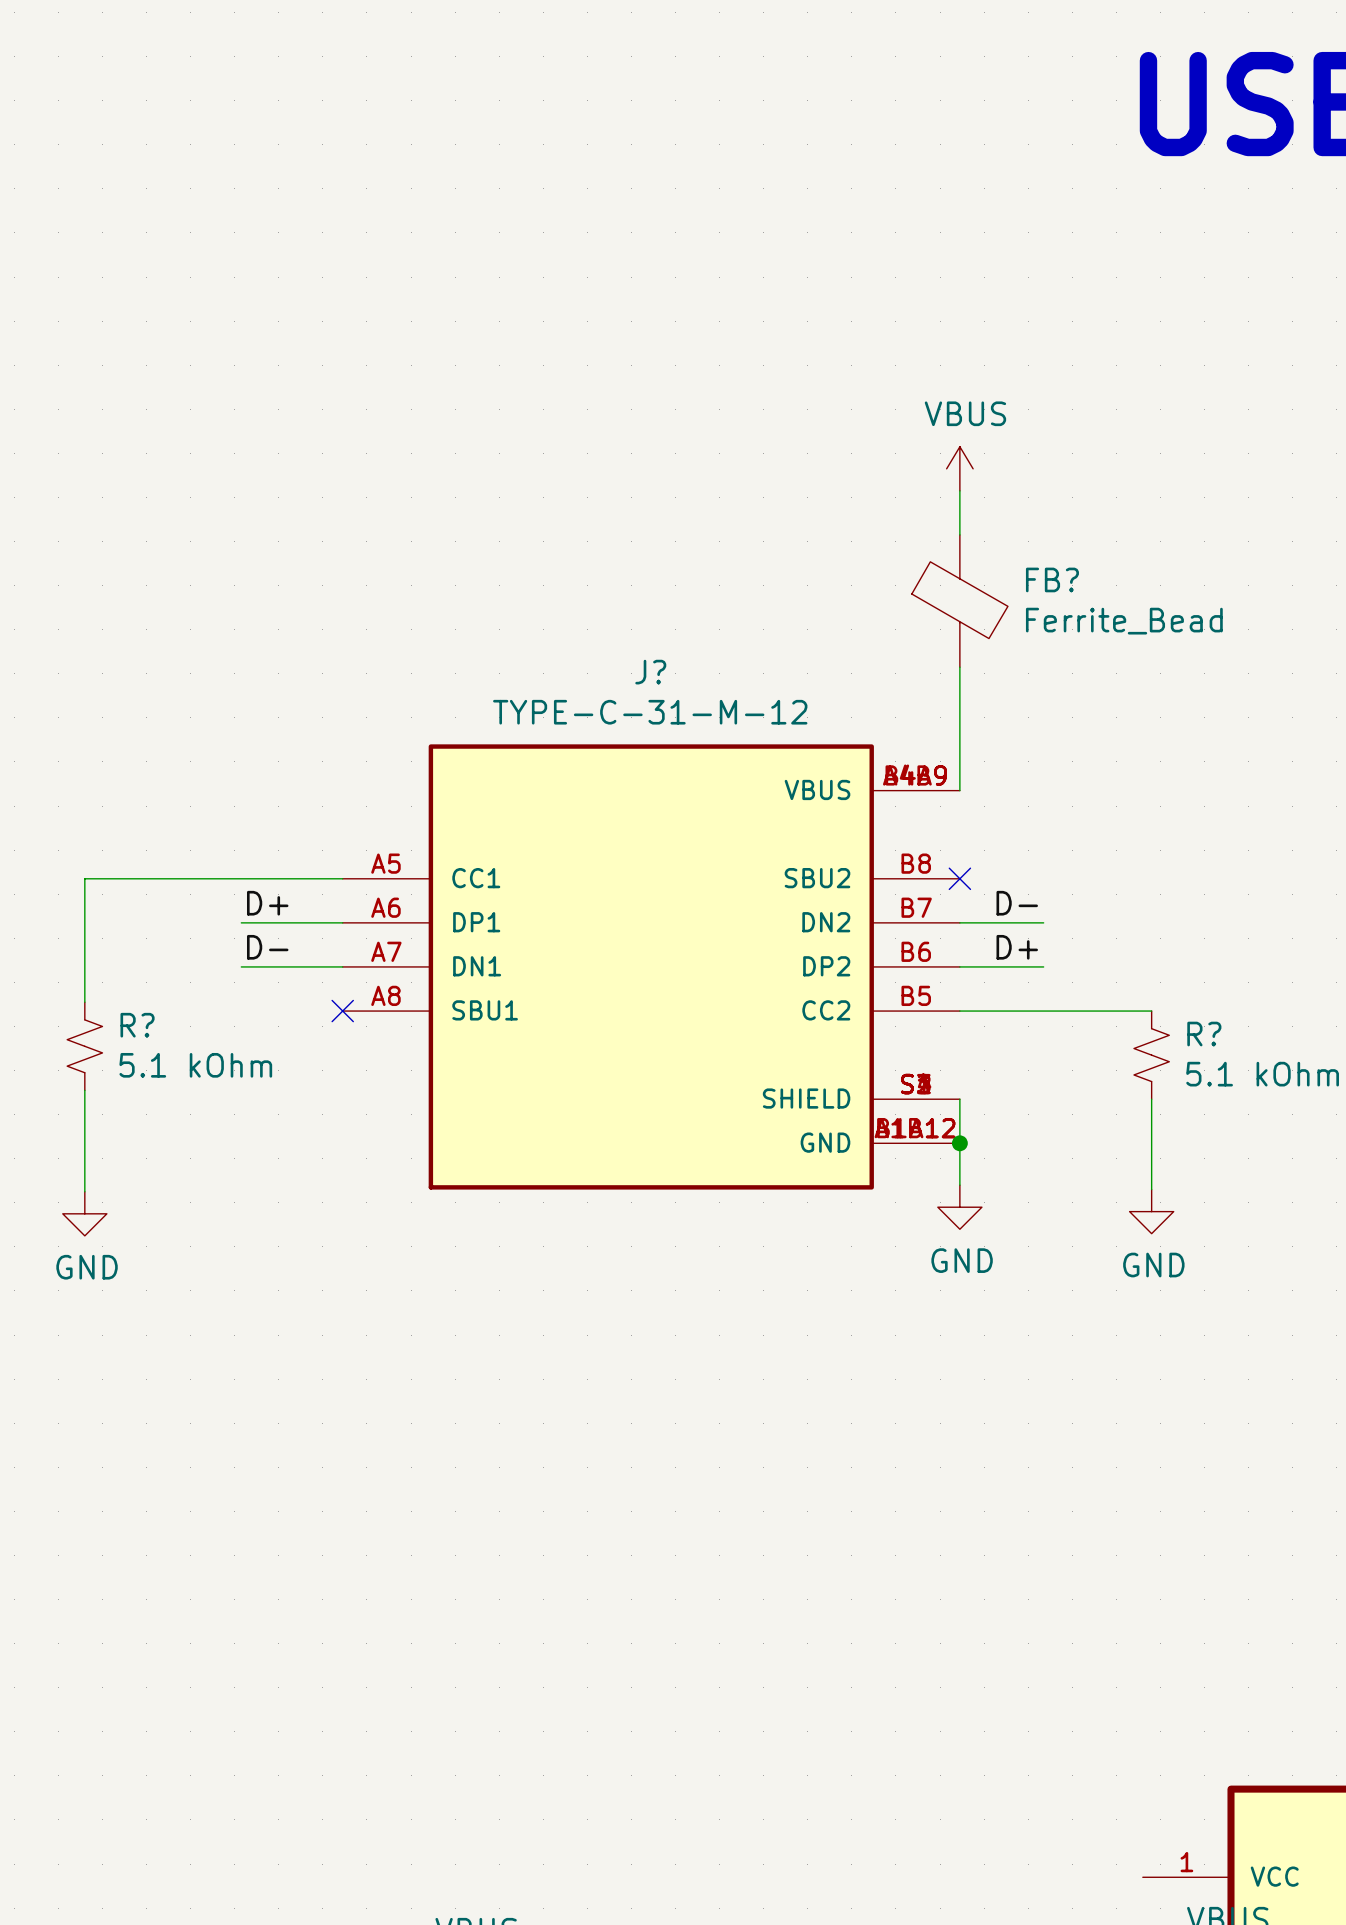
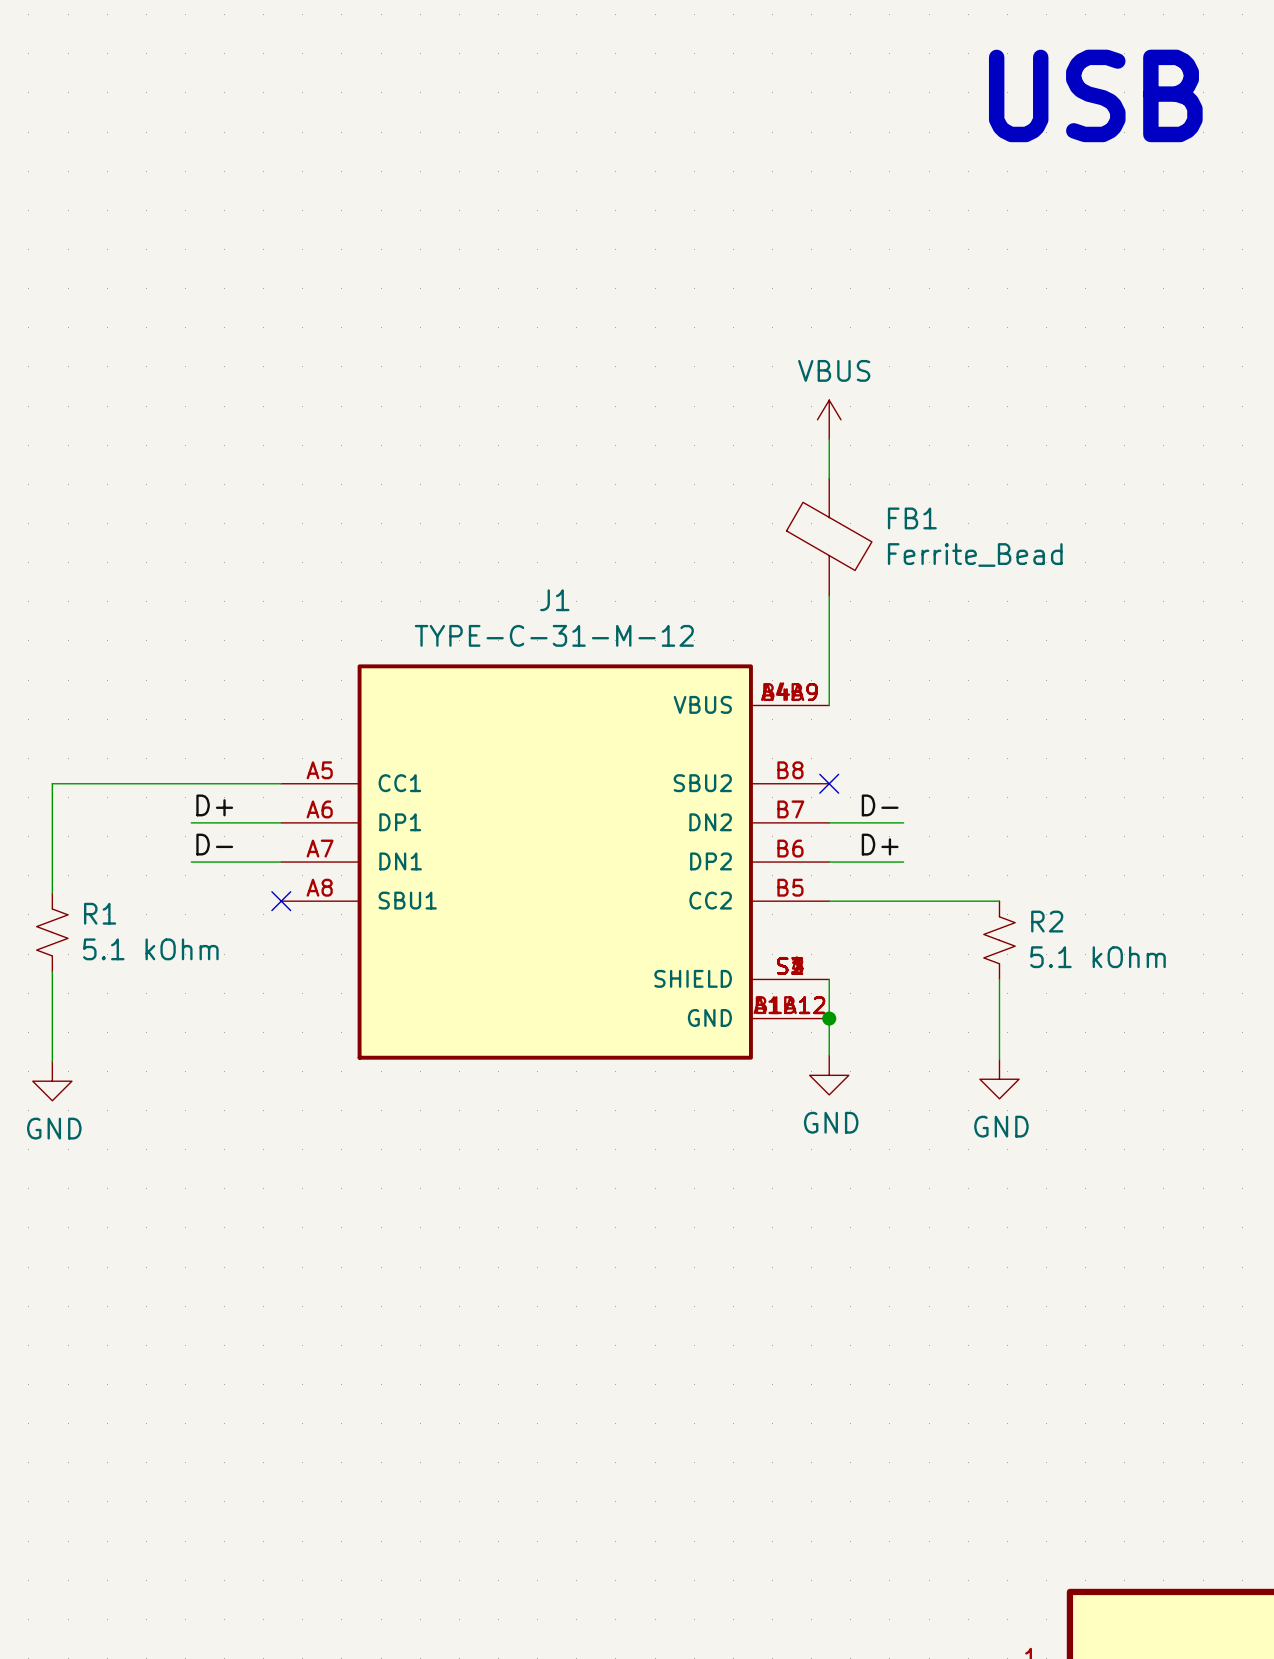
FB? name: FB? (1052, 579) -> FB1 (912, 518)
J? name: J? (650, 672) -> J1 (554, 600)
R? name: R? (137, 1025) -> R1 (100, 913)
R? name: R? (1204, 1034) -> R2 (1047, 921)

